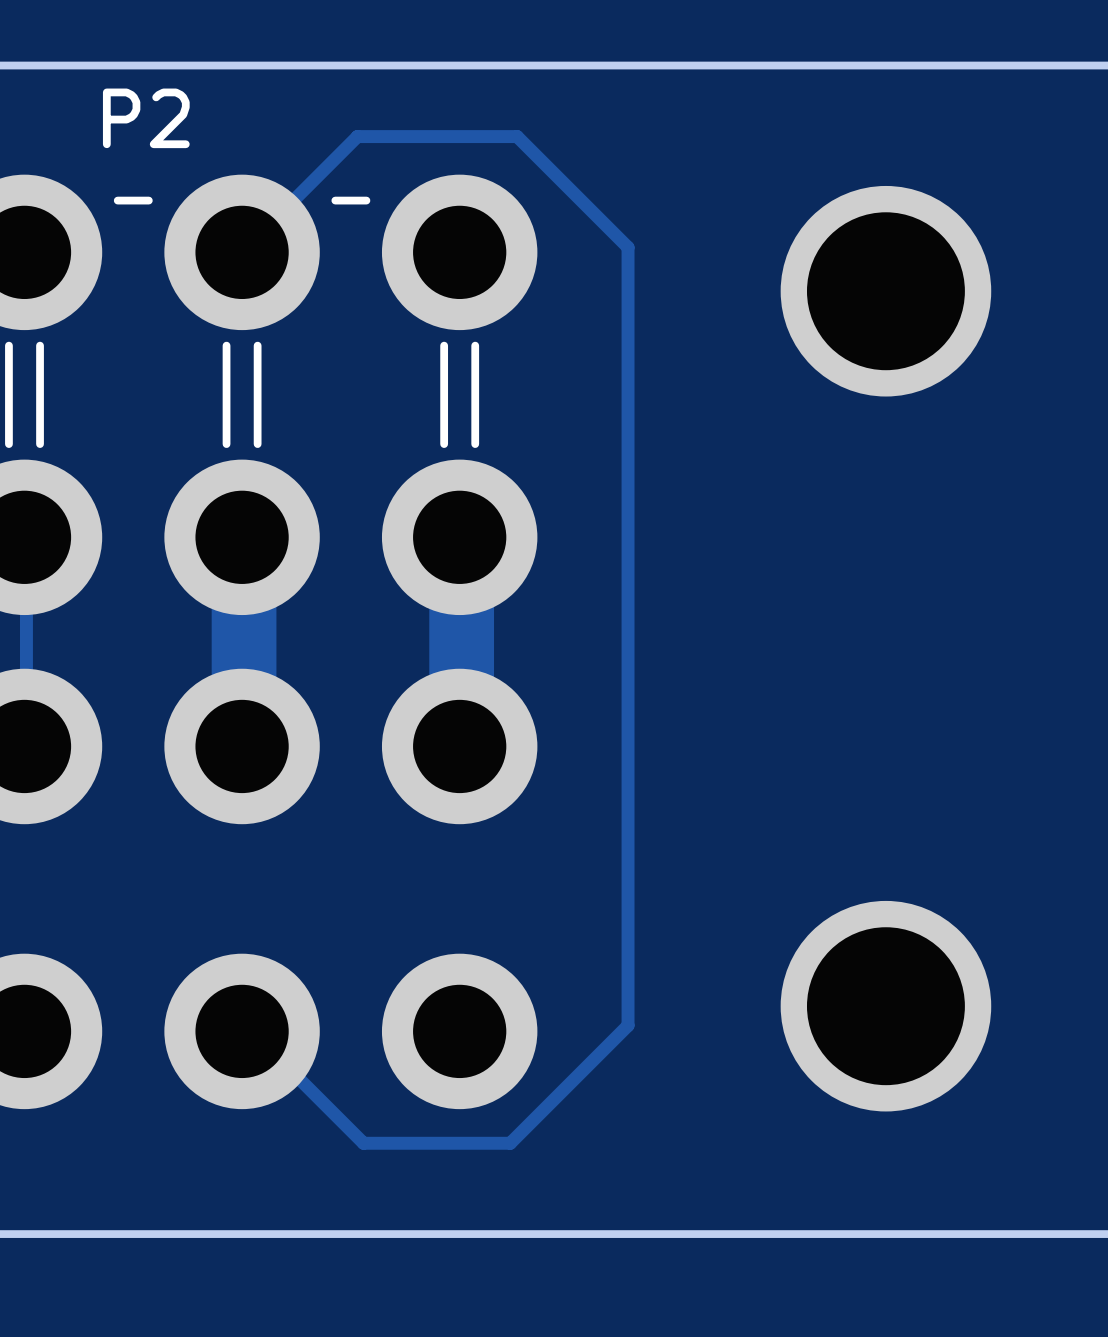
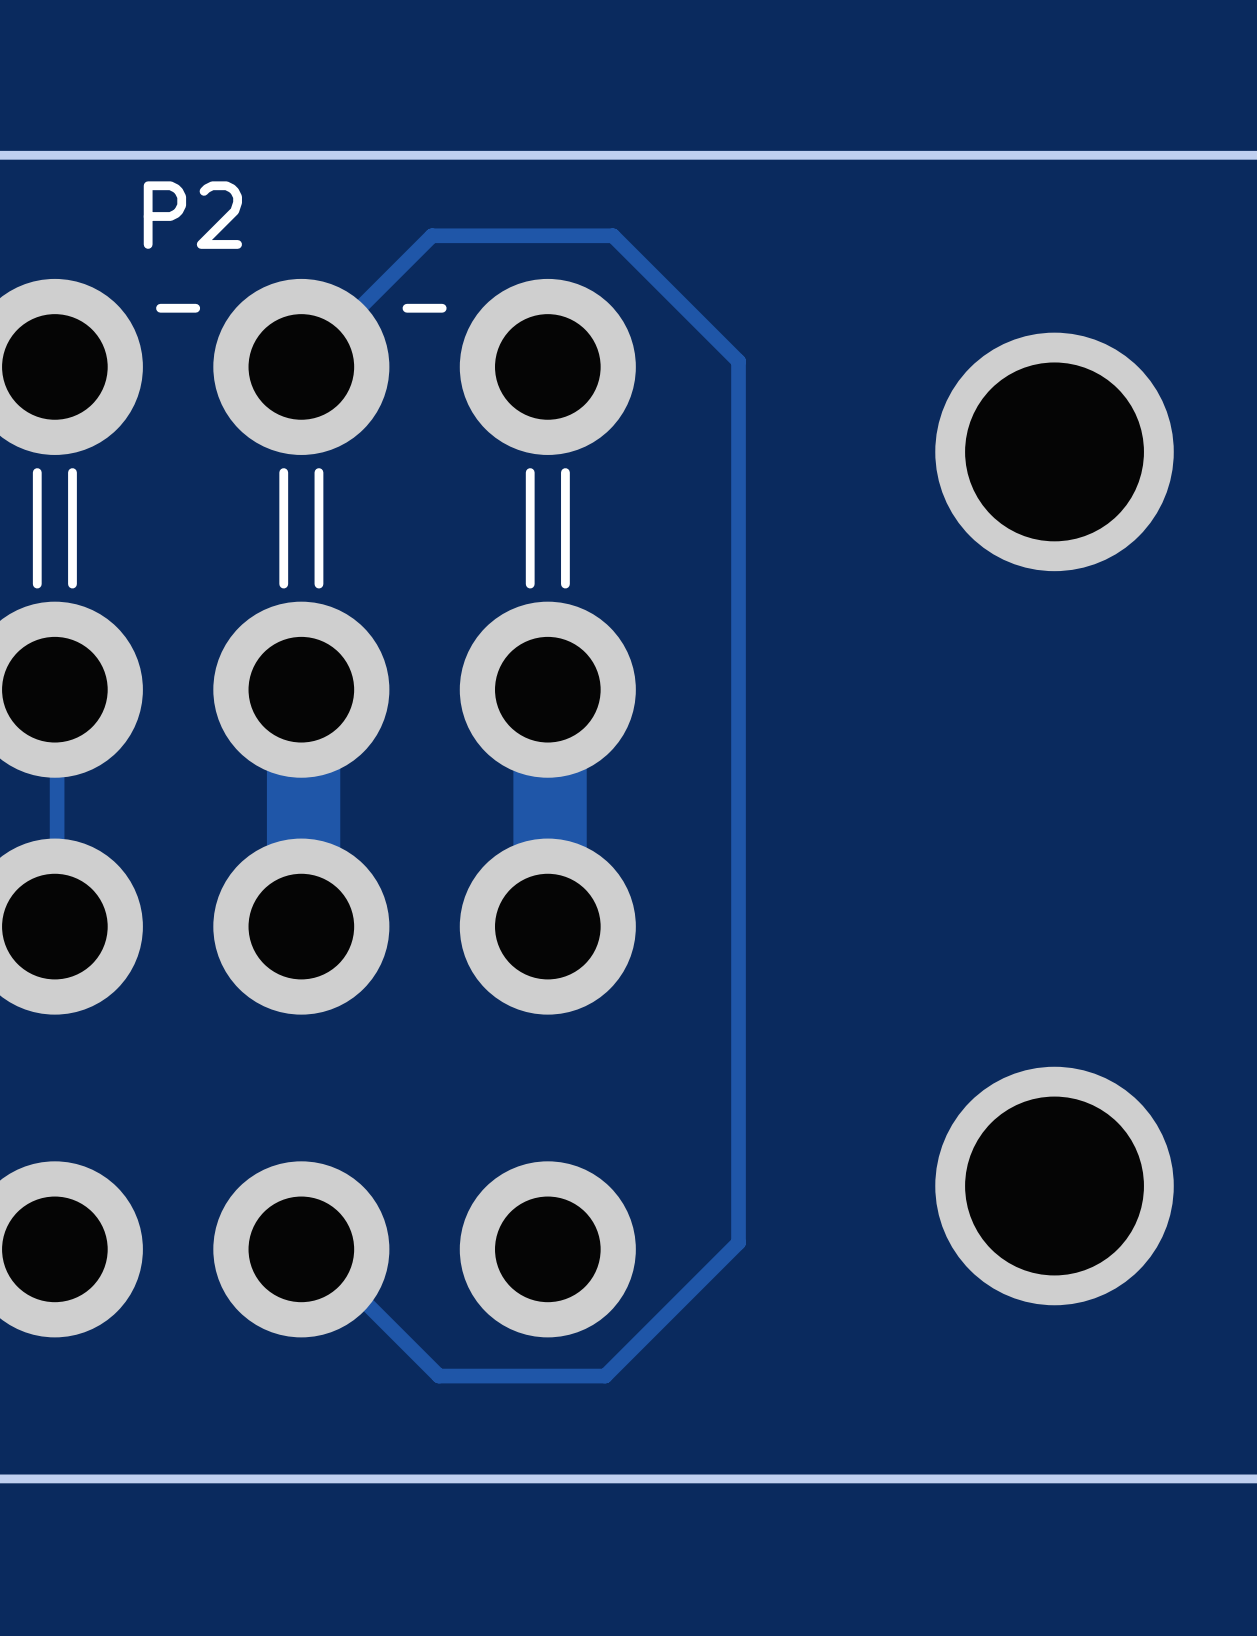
part position: (885, 291) -> (1054, 451)
part position: (885, 1006) -> (1054, 1186)

